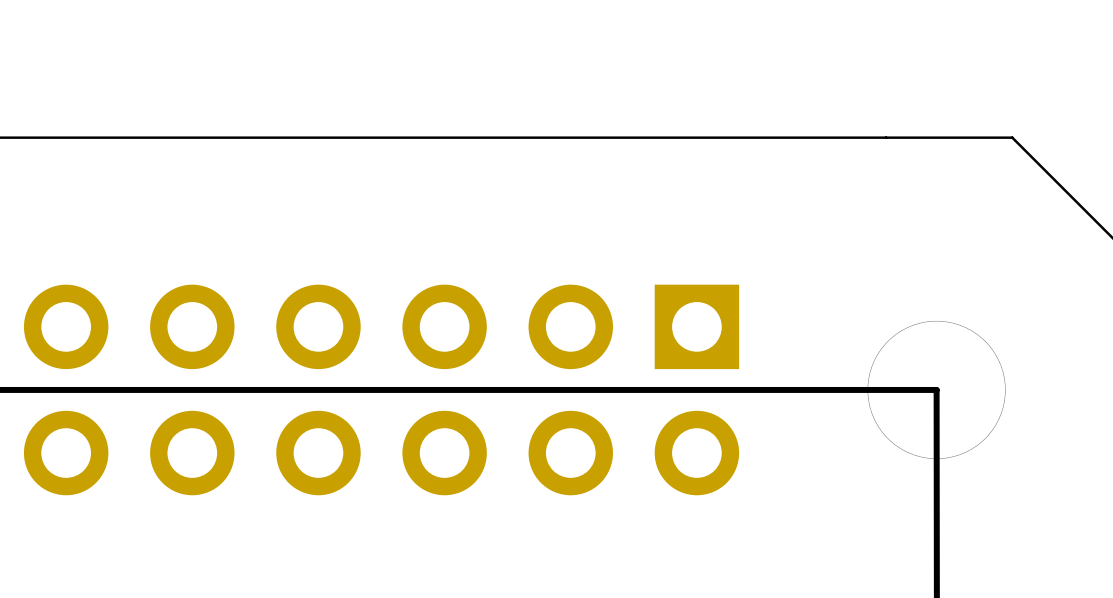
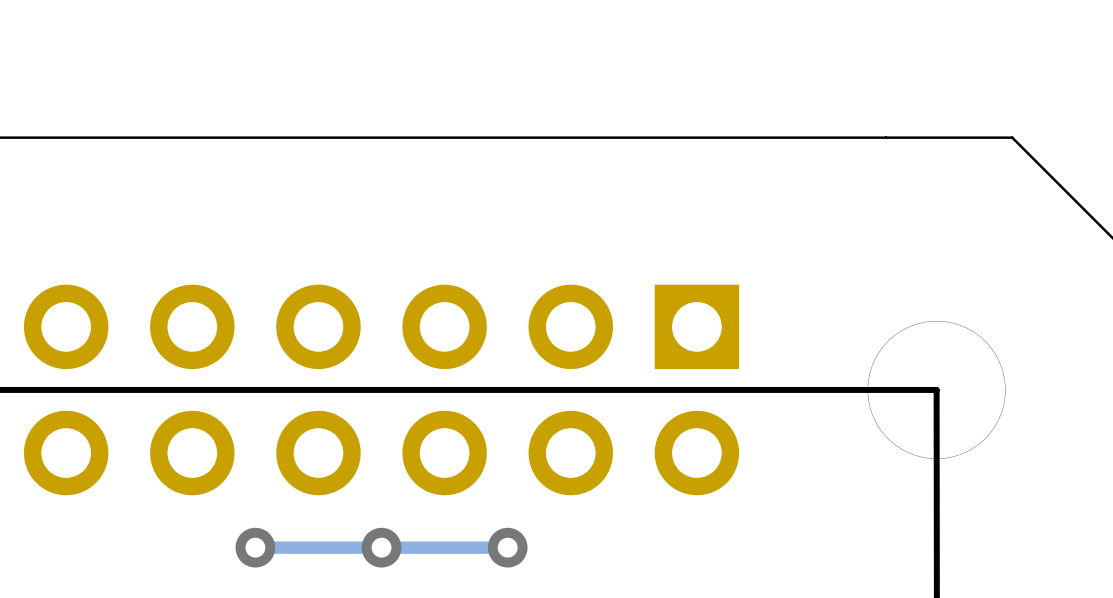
via: none -> (255, 547)
via: none -> (381, 547)
track: none -> (507, 547) (255, 547)
via: none -> (507, 547)

